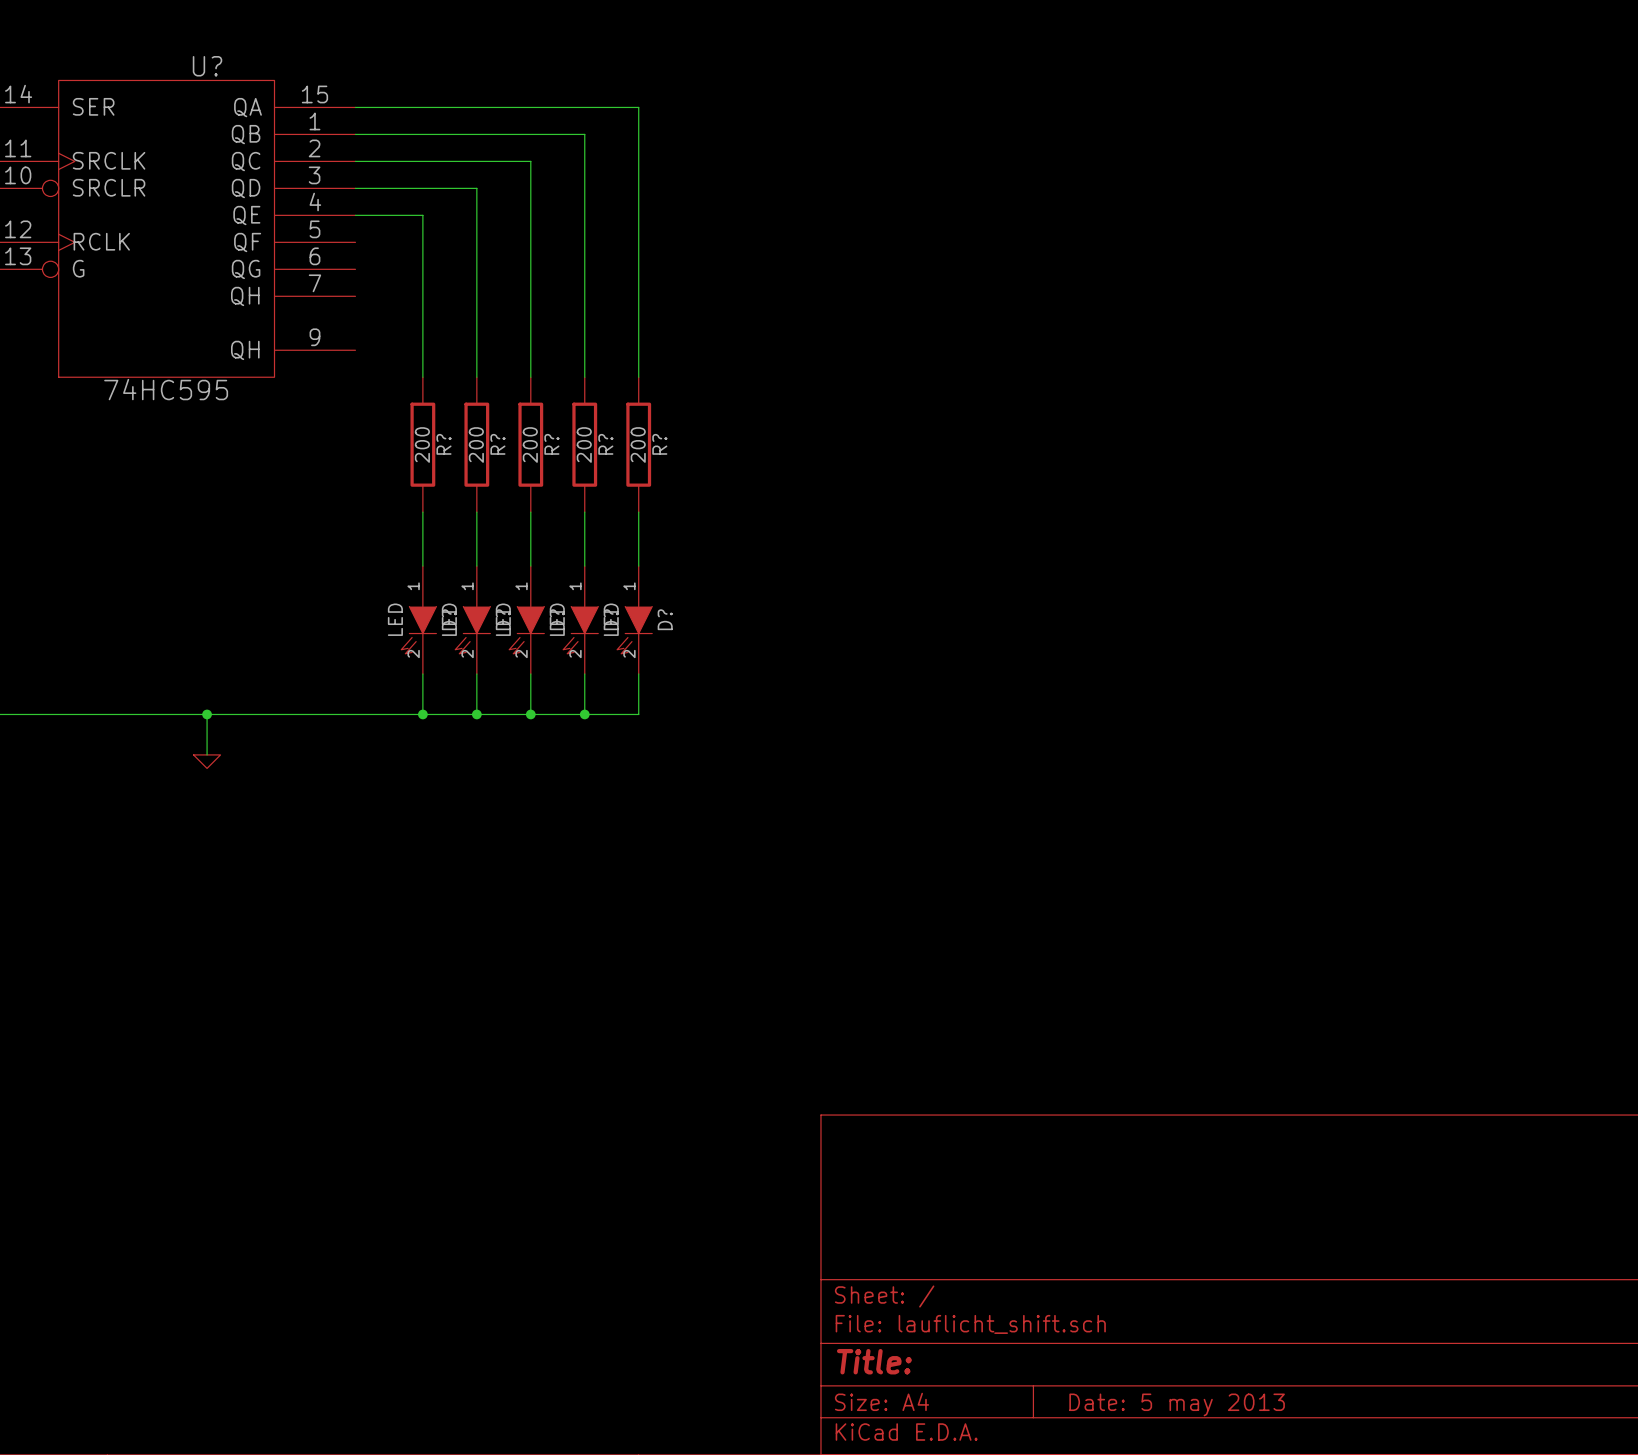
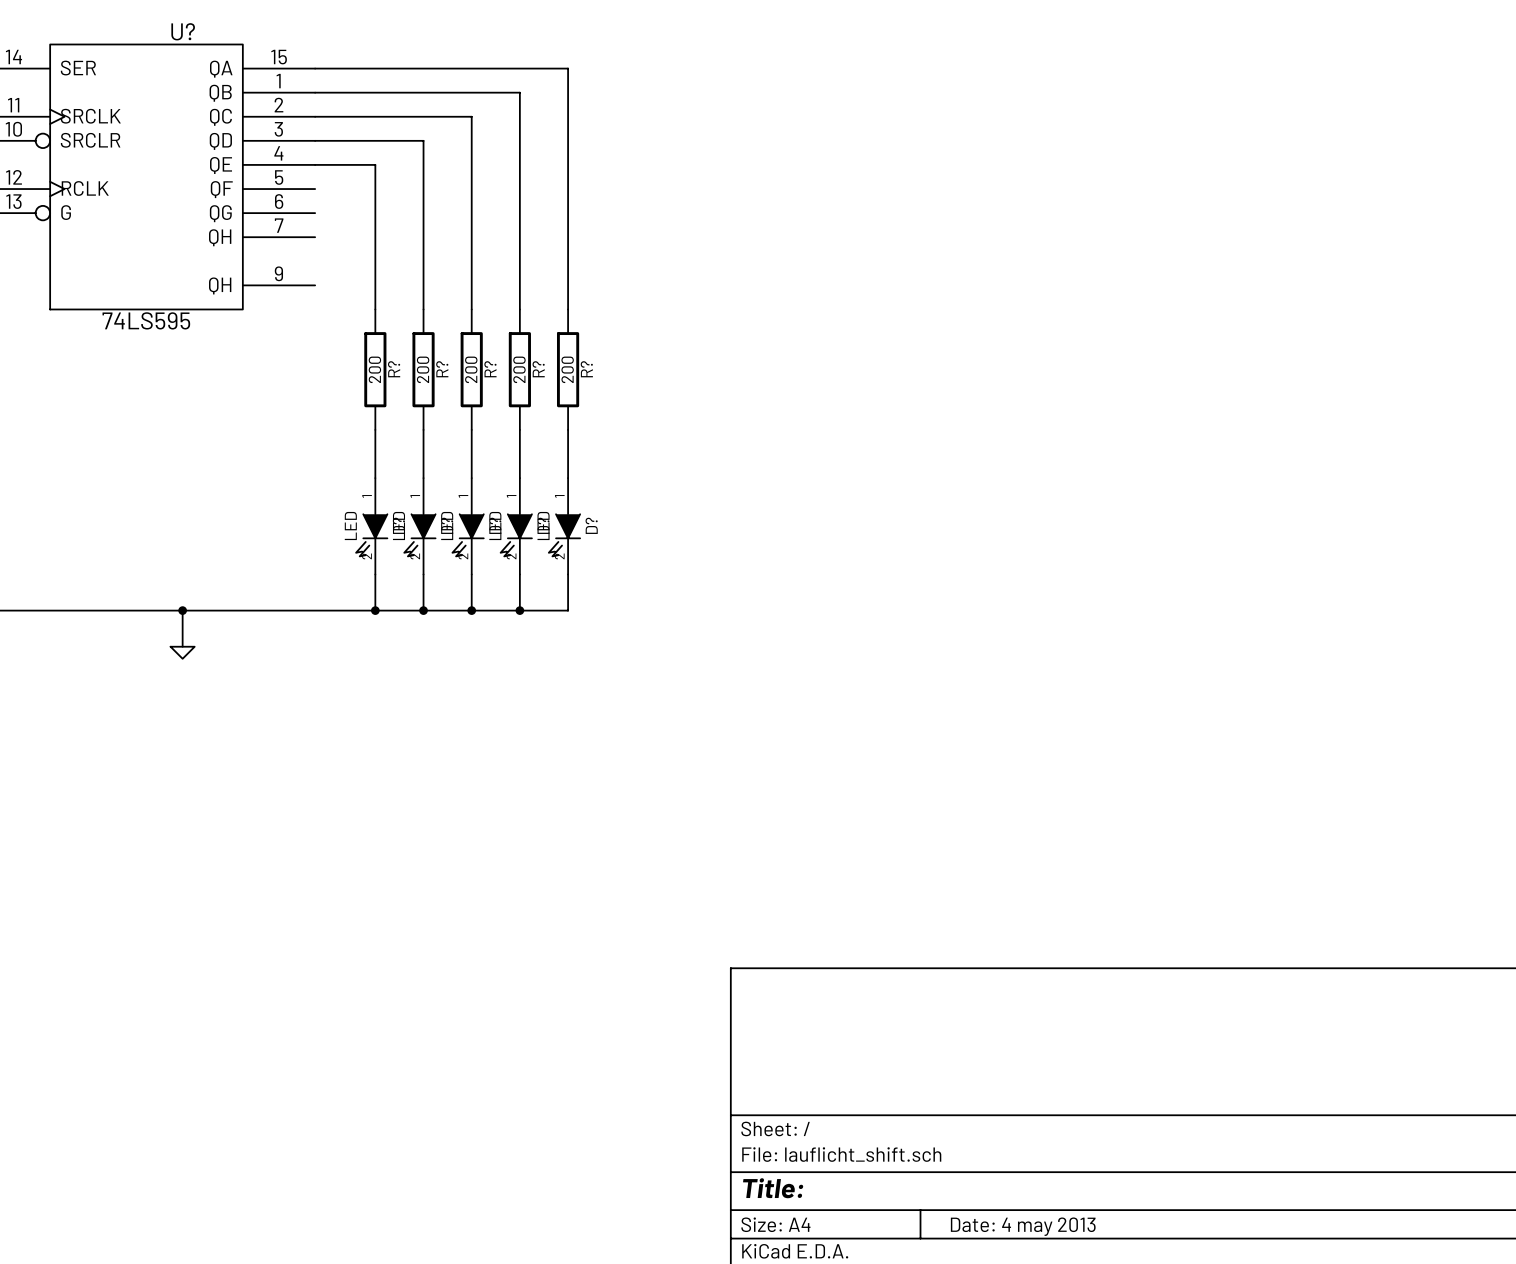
U? value: 74HC595 (166, 389) -> 74LS595 (146, 320)
title block: Date: 5 may 2013 (1177, 1404) -> Date: 4 may 2013 (1023, 1226)

